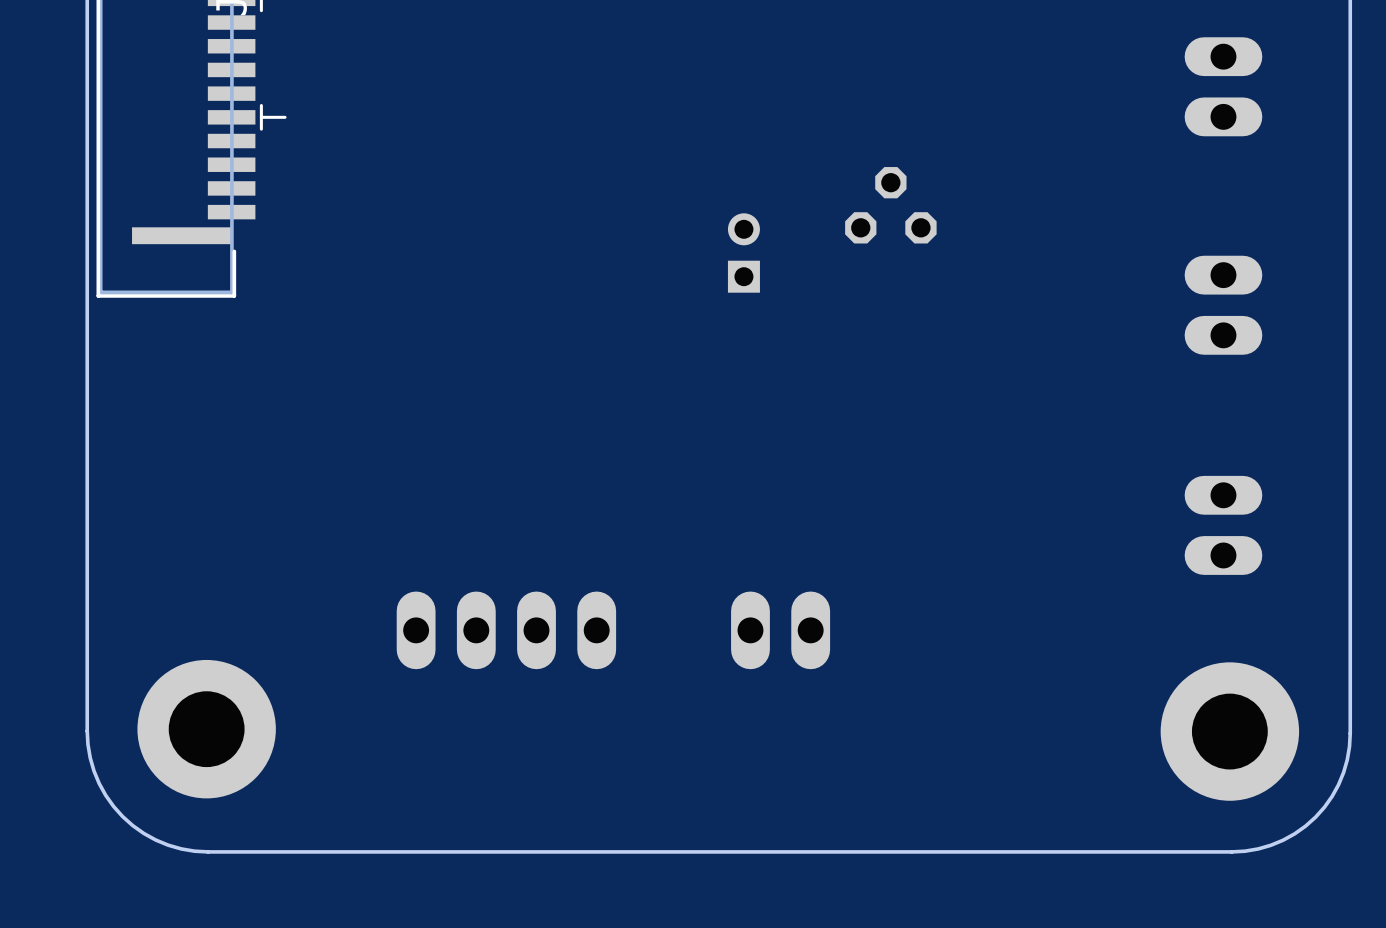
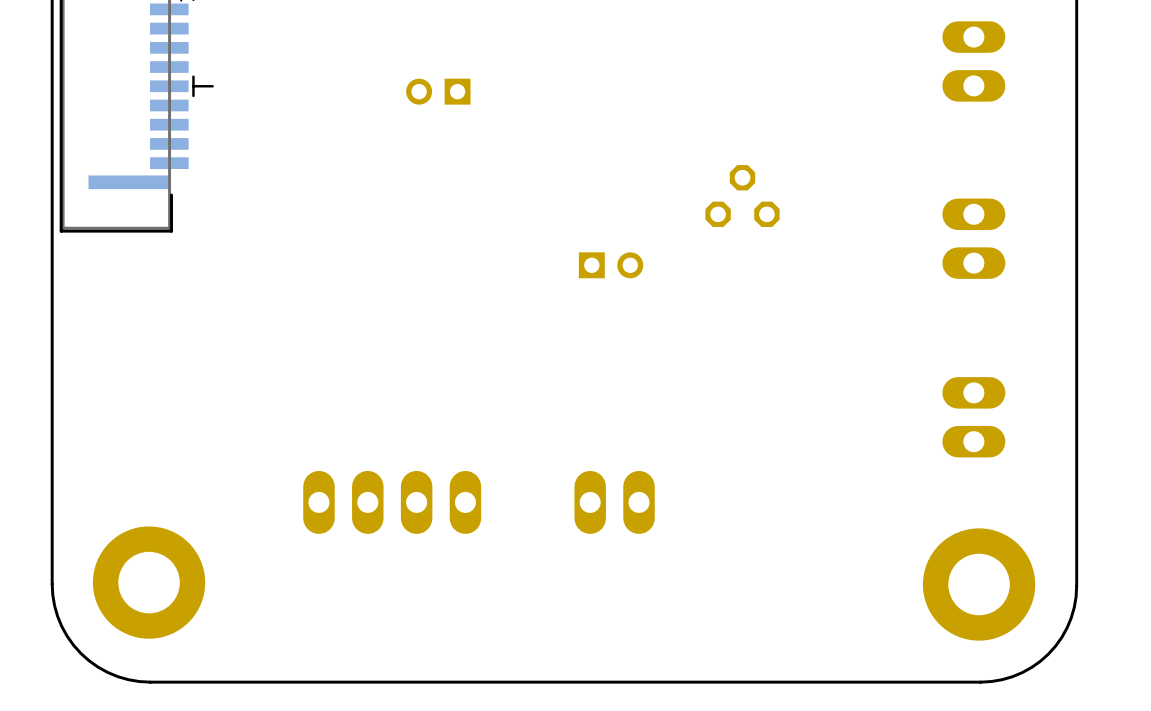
part: none -> (438, 91)
part position: (890, 205) -> (742, 196)
part rotation: 0° (743, 253) -> 90° clockwise (611, 265)
part position: (743, 253) -> (611, 265)

